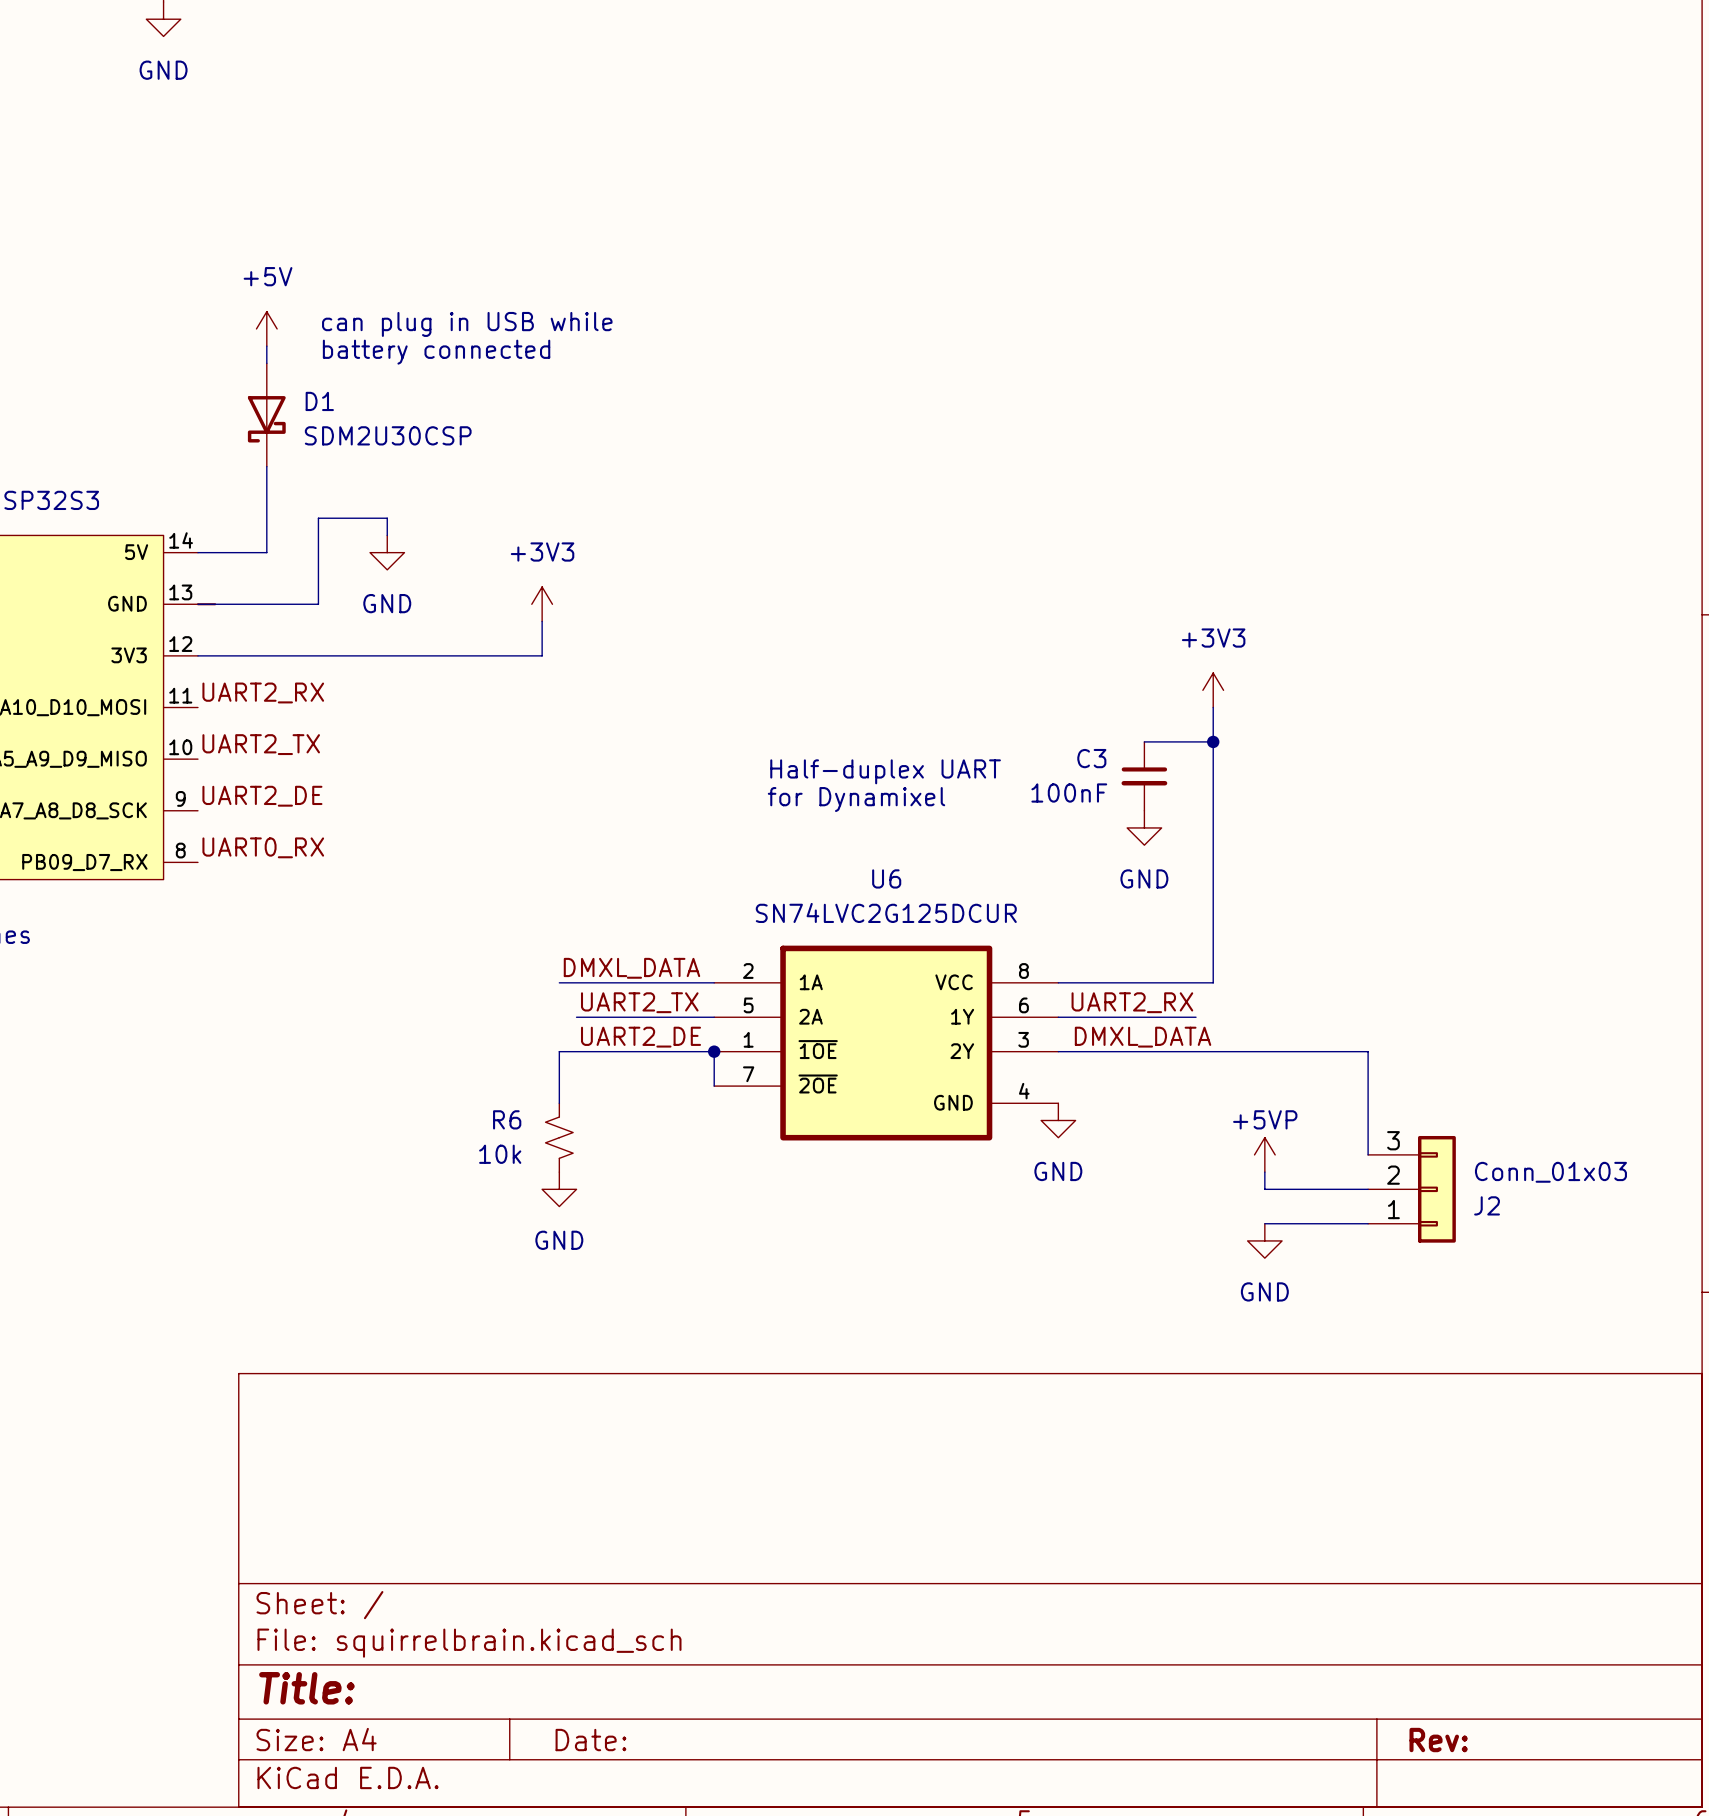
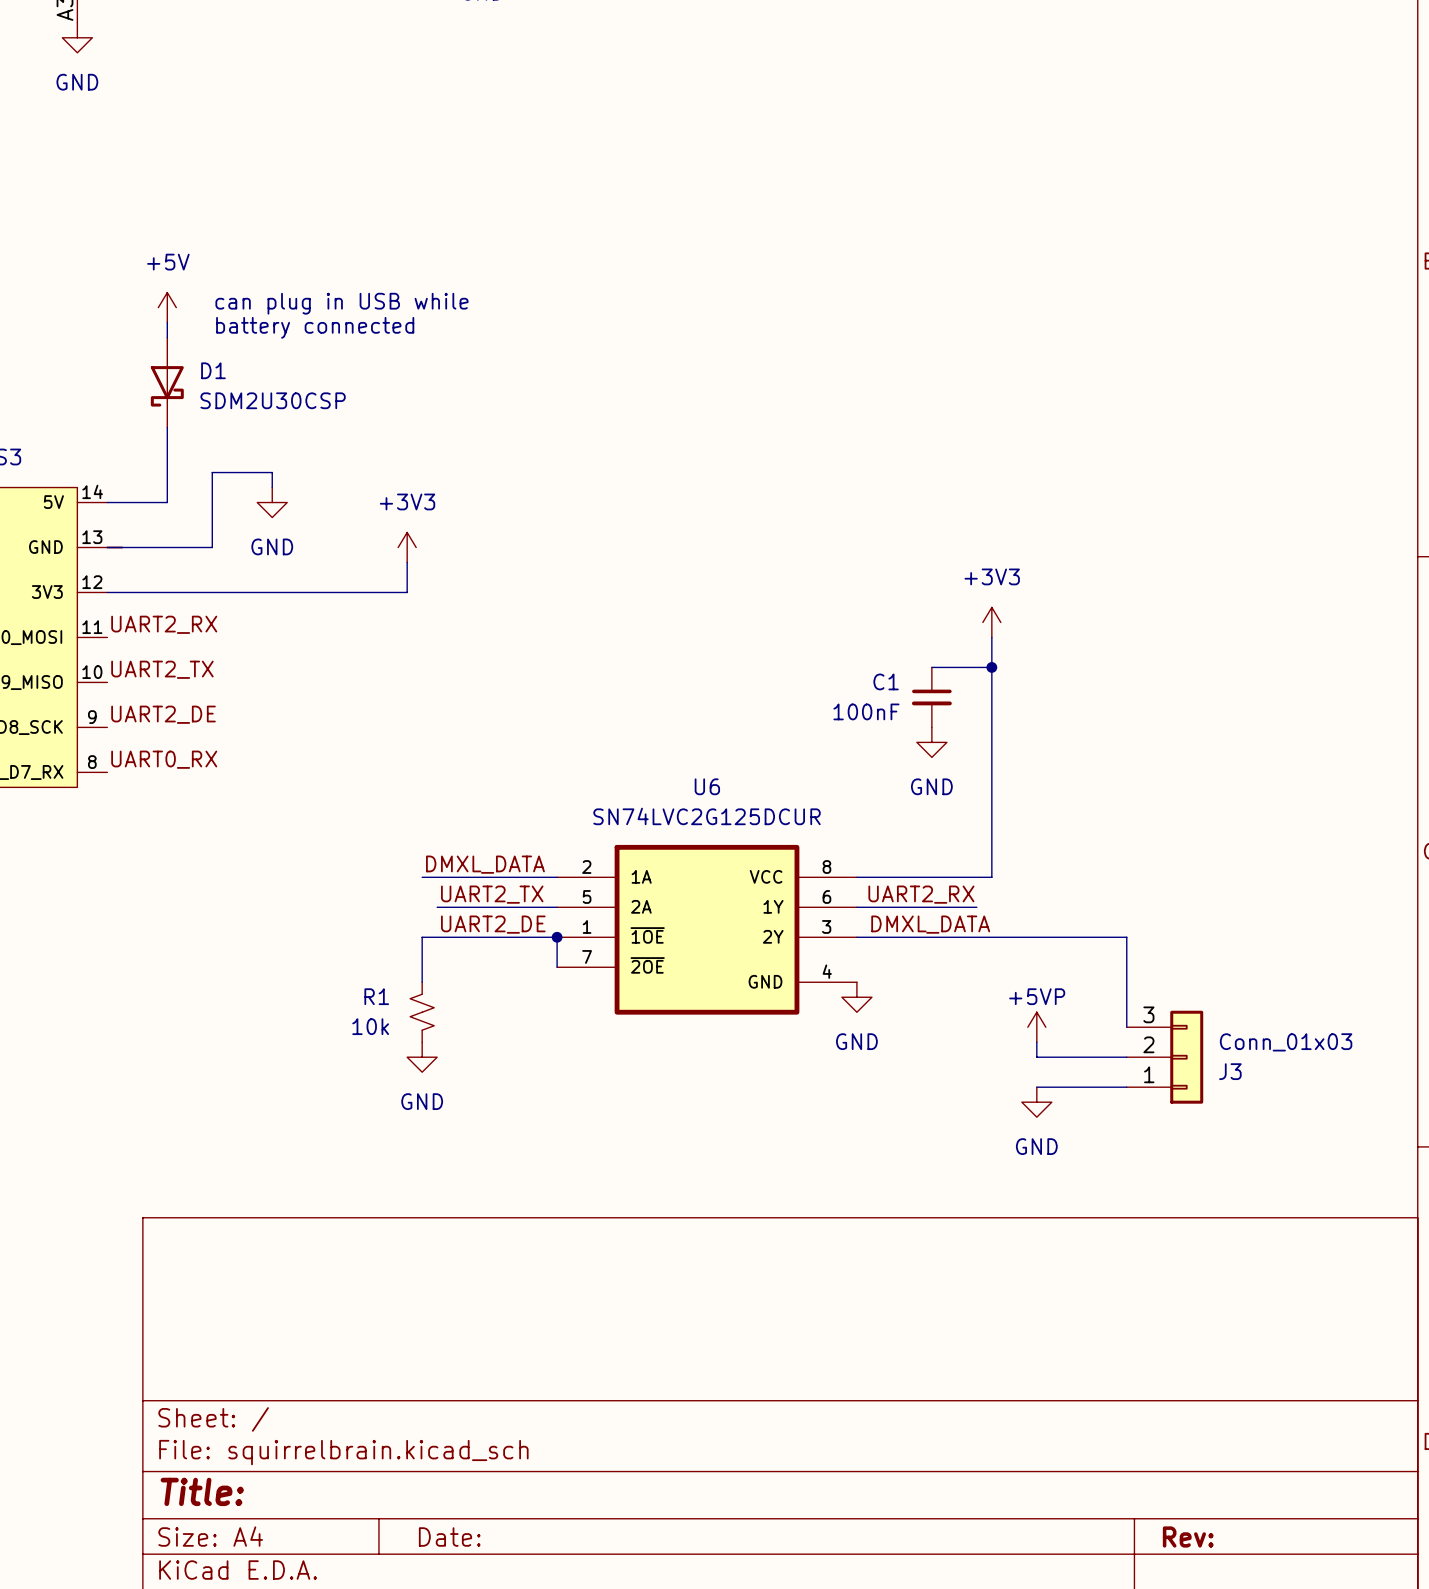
C3 name: C3 (1091, 758) -> C1 (886, 681)
text: Half-duplex UART (885, 771) -> none
text: for Dynamixel (856, 799) -> none
R6 name: R6 (507, 1119) -> R1 (376, 996)
J2 name: J2 (1487, 1205) -> J3 (1230, 1071)

